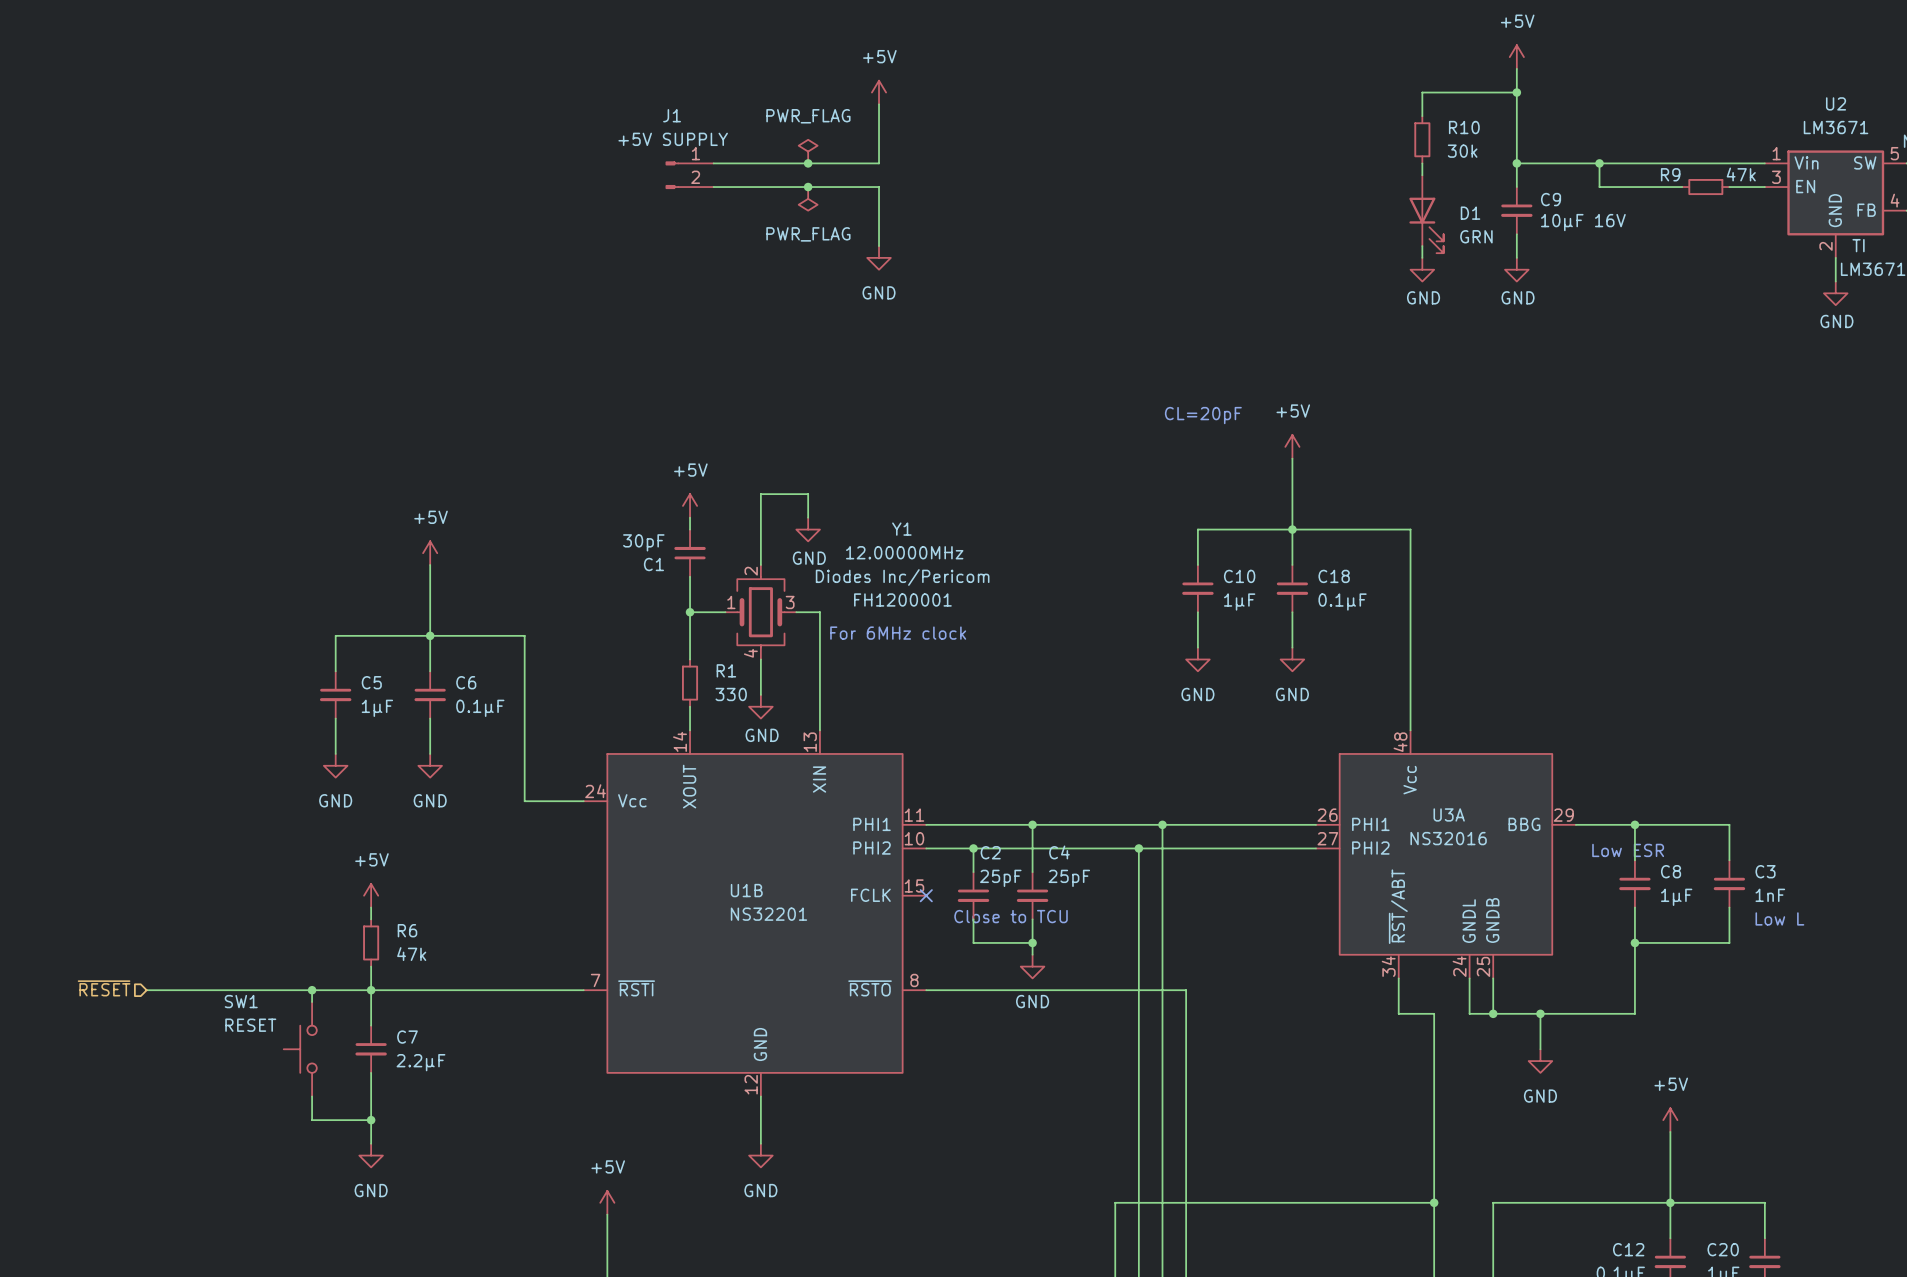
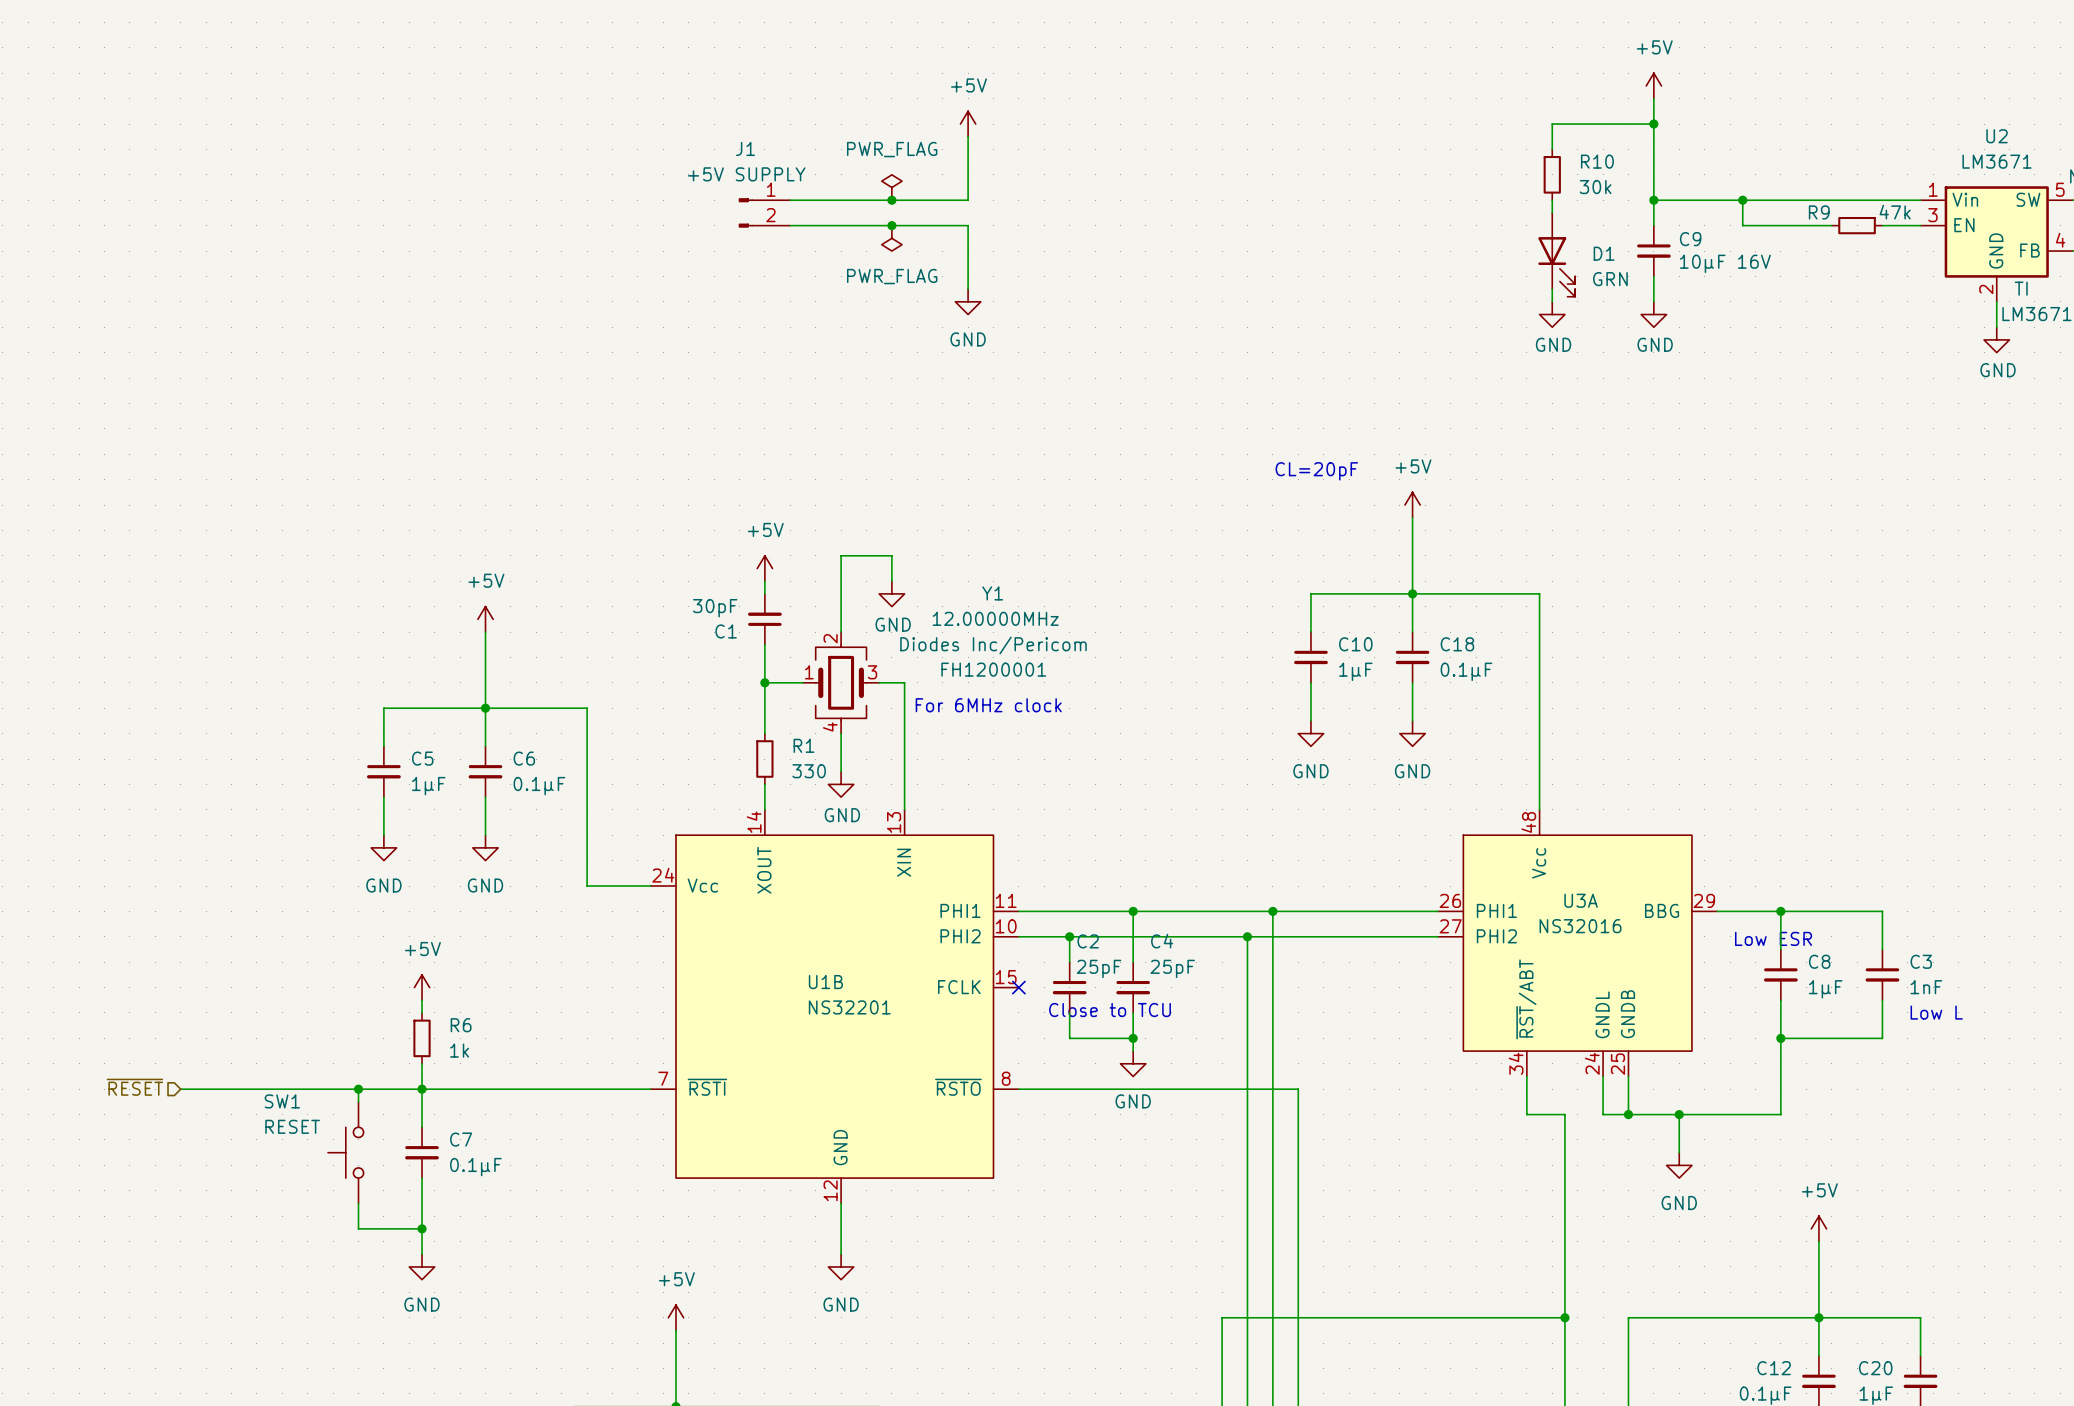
R6 value: 47k (411, 954) -> 1k (459, 1050)
C7 value: 2.2µF (420, 1062) -> 0.1µF (475, 1167)

